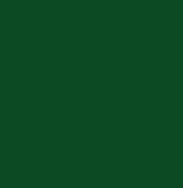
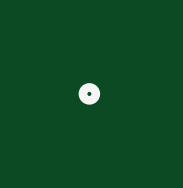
part: none -> (89, 93)

